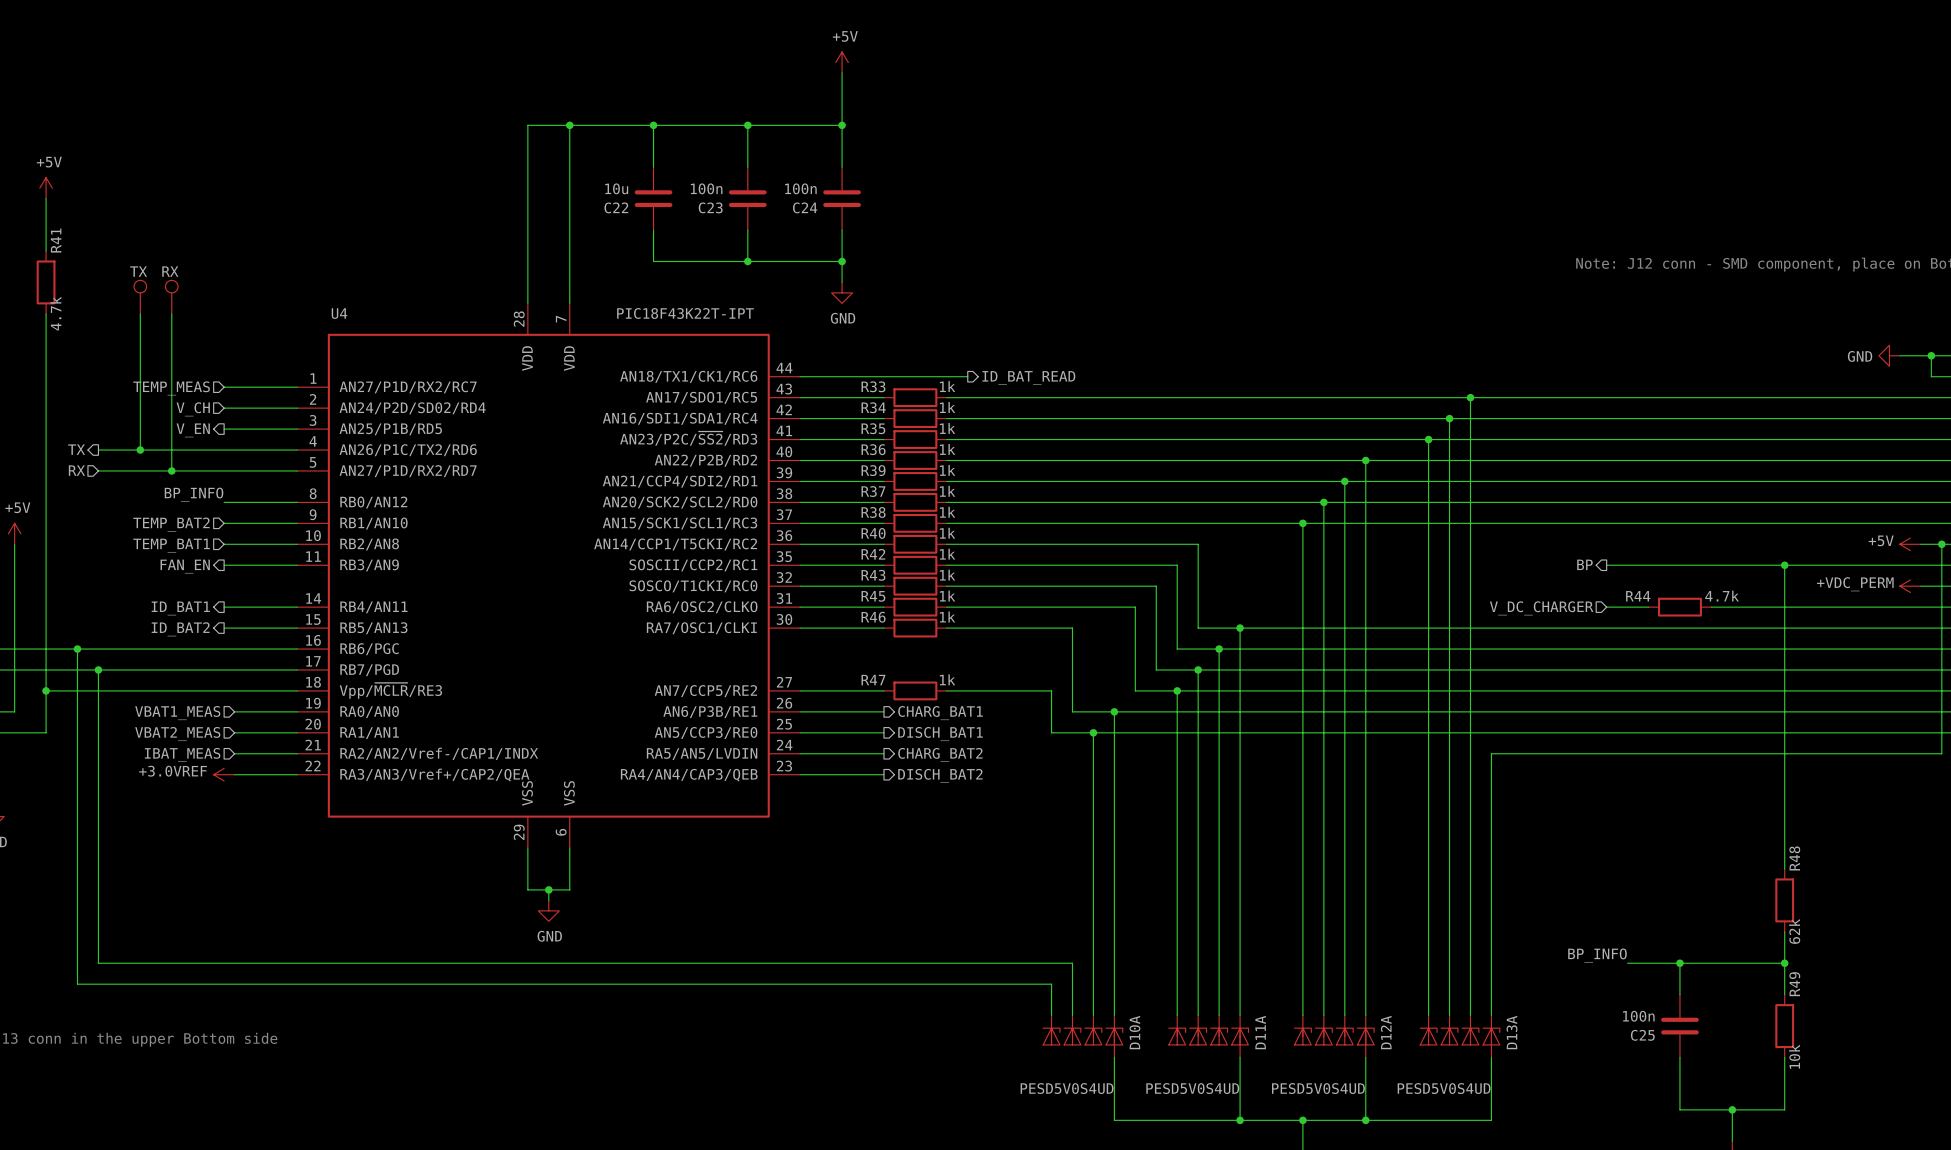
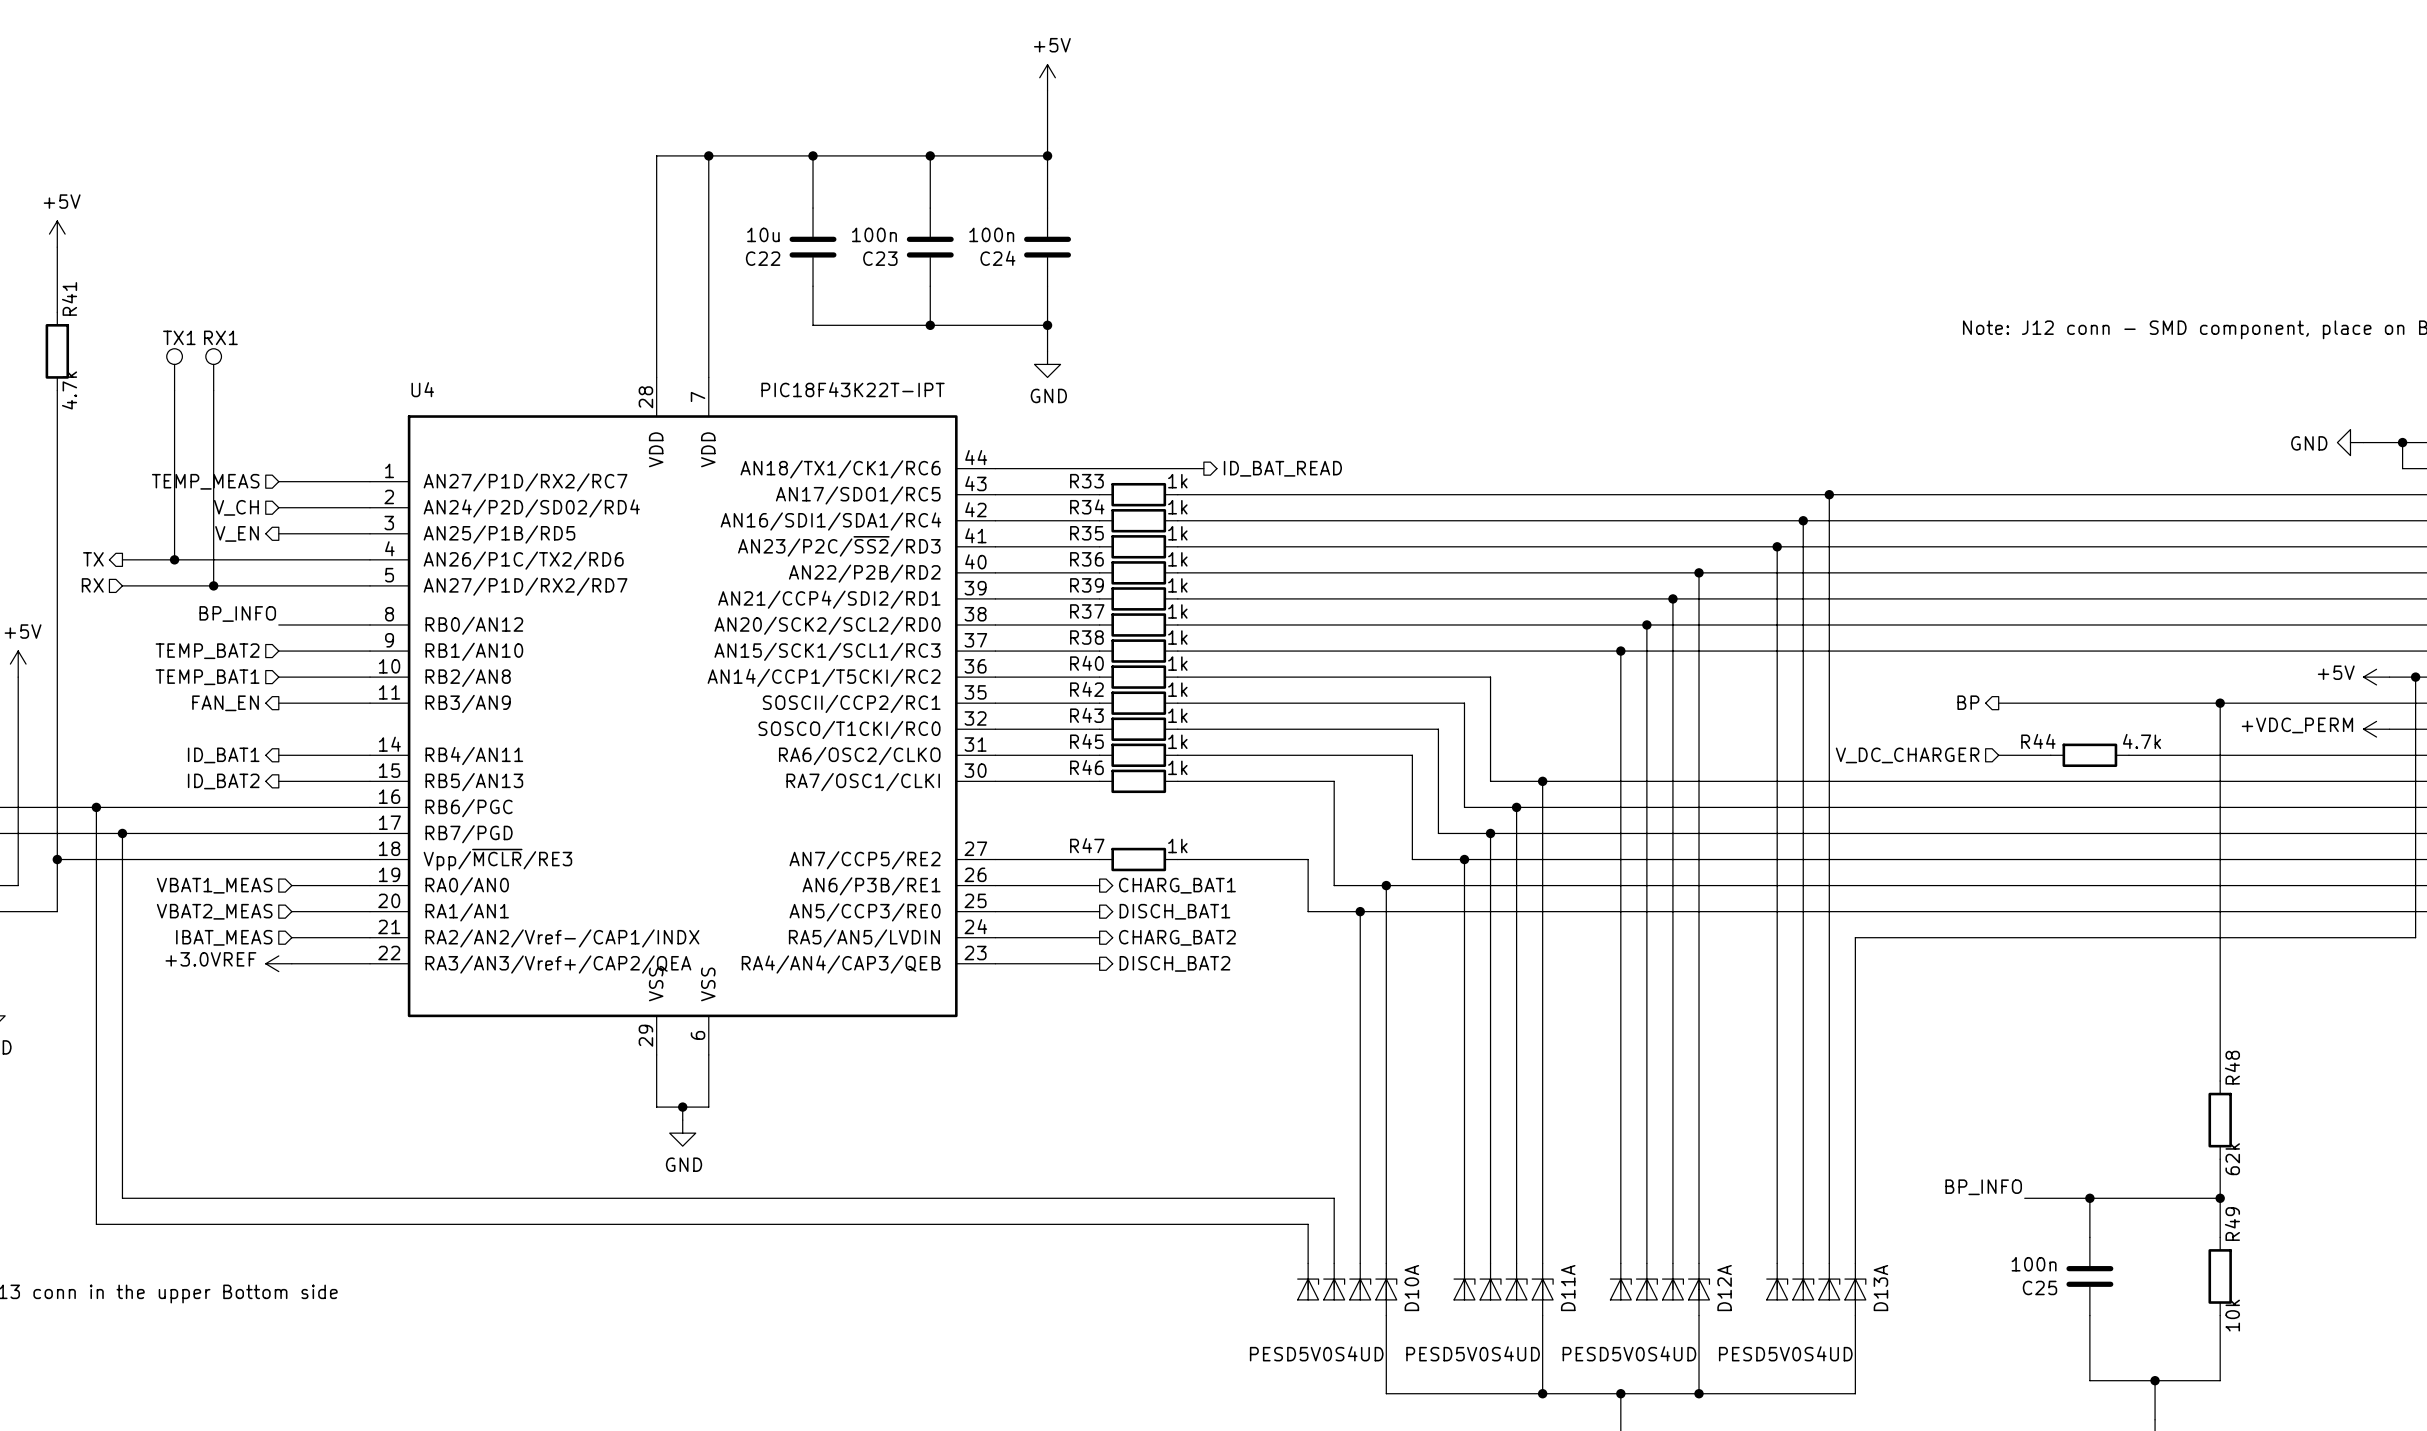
TX name: TX (138, 271) -> TX1 (179, 337)
RX name: RX (170, 271) -> RX1 (220, 337)

